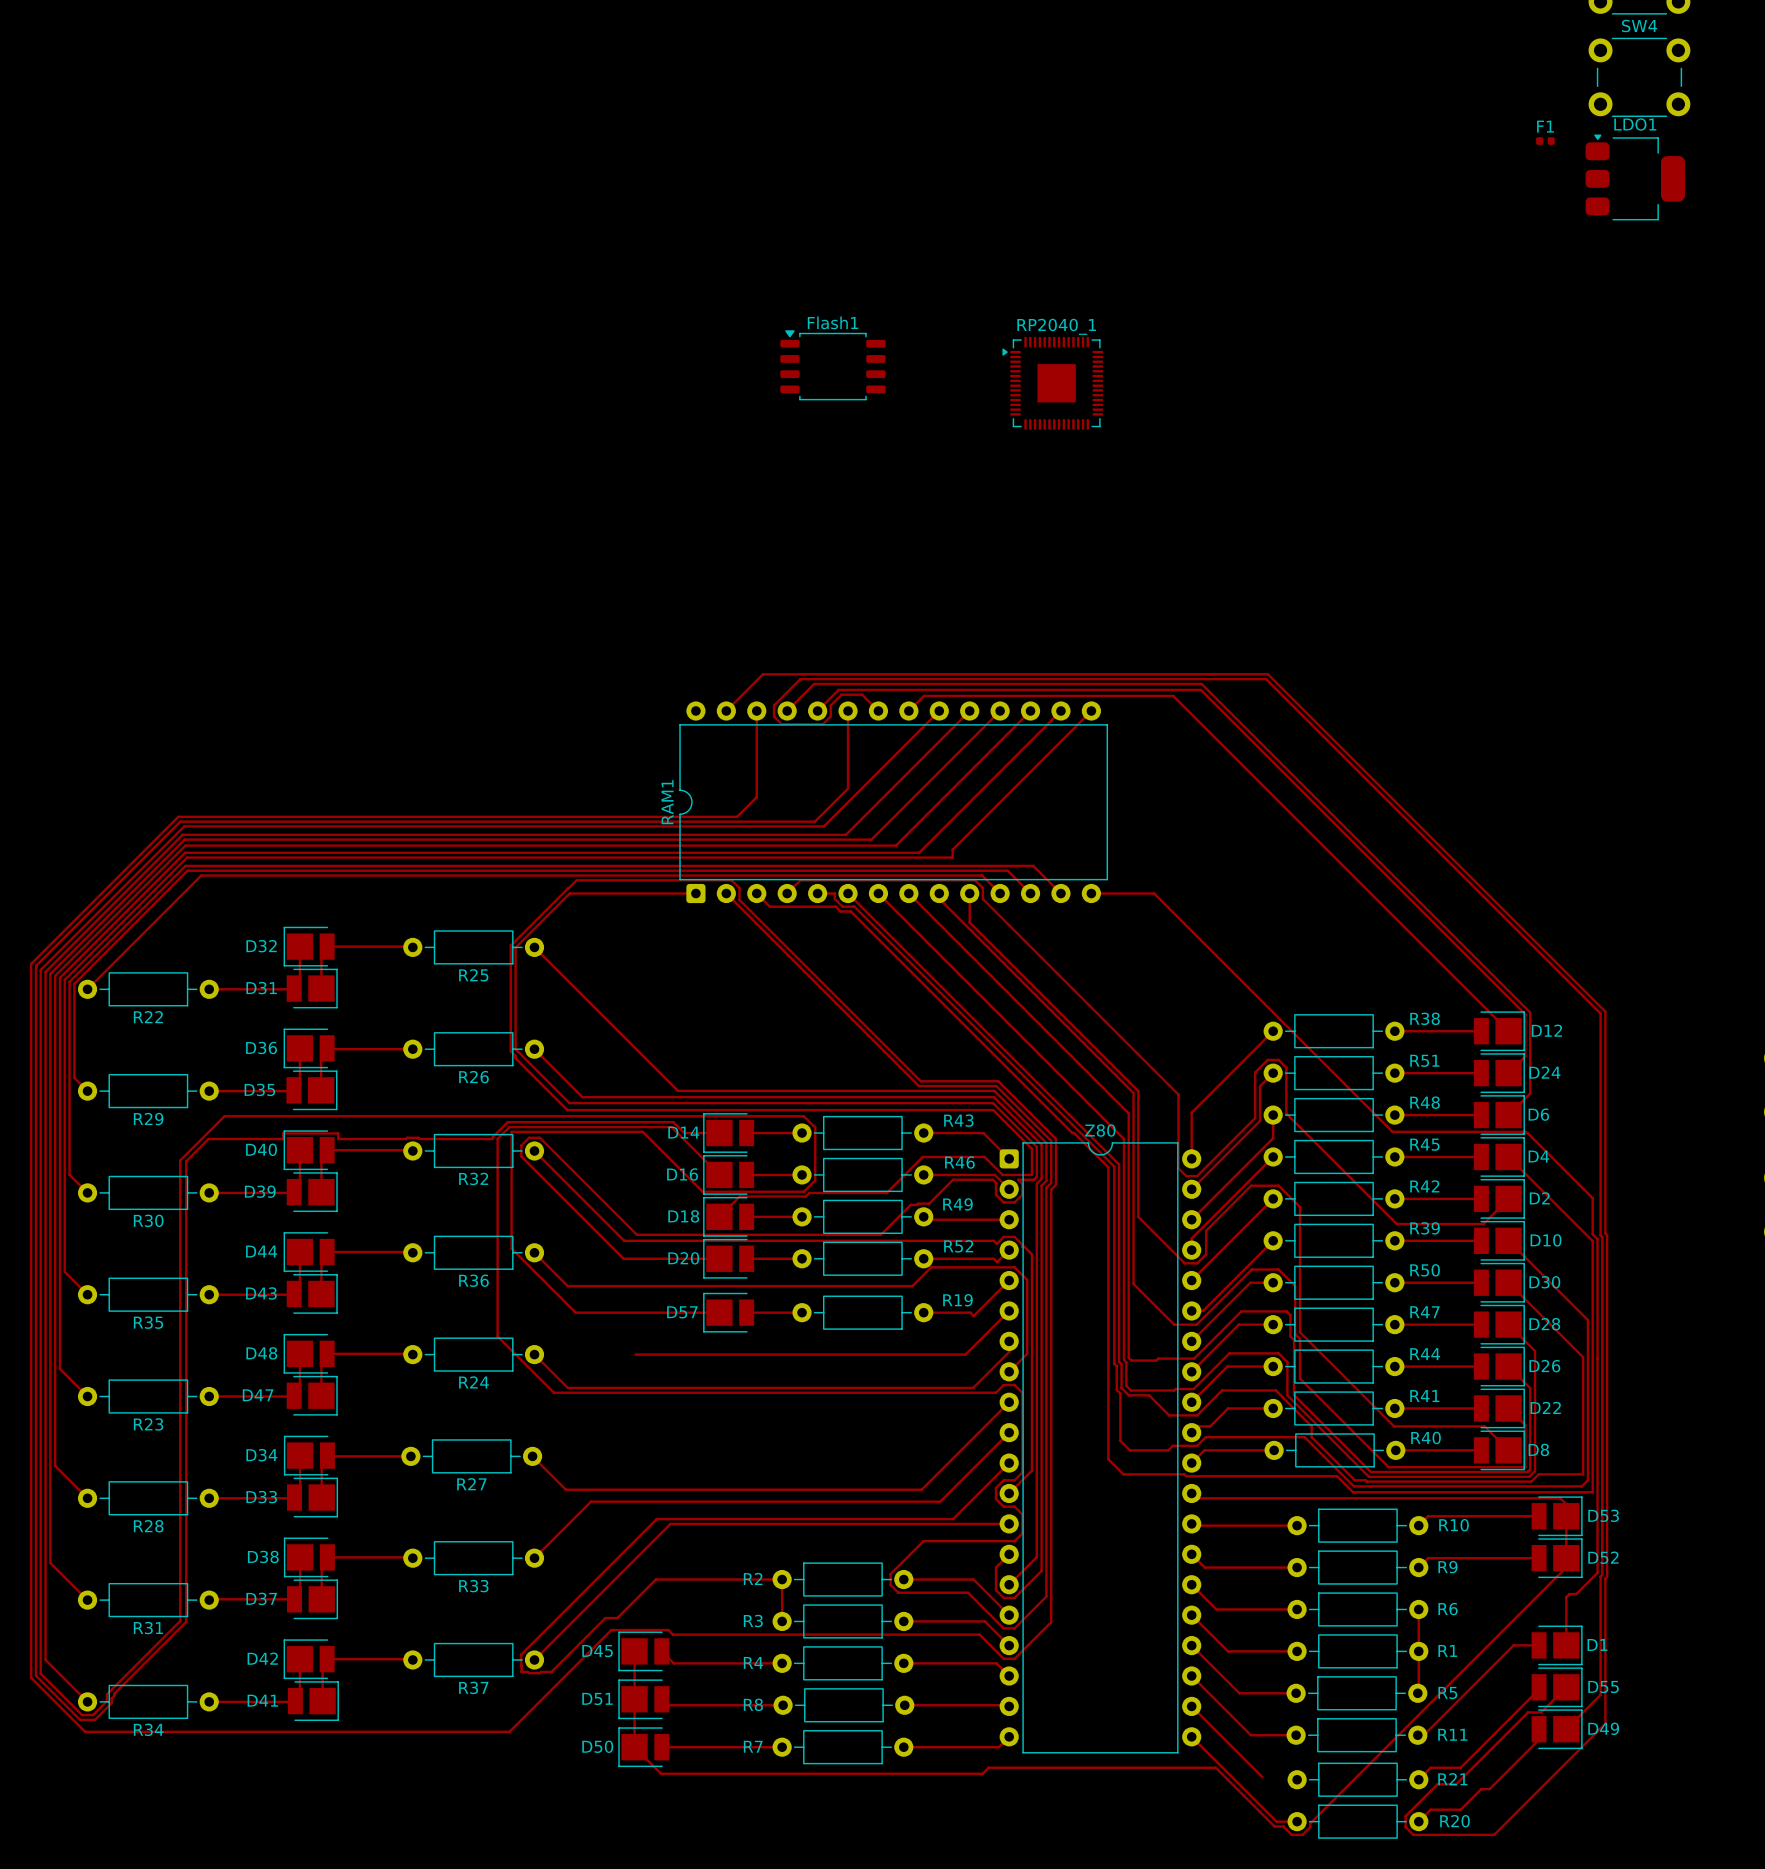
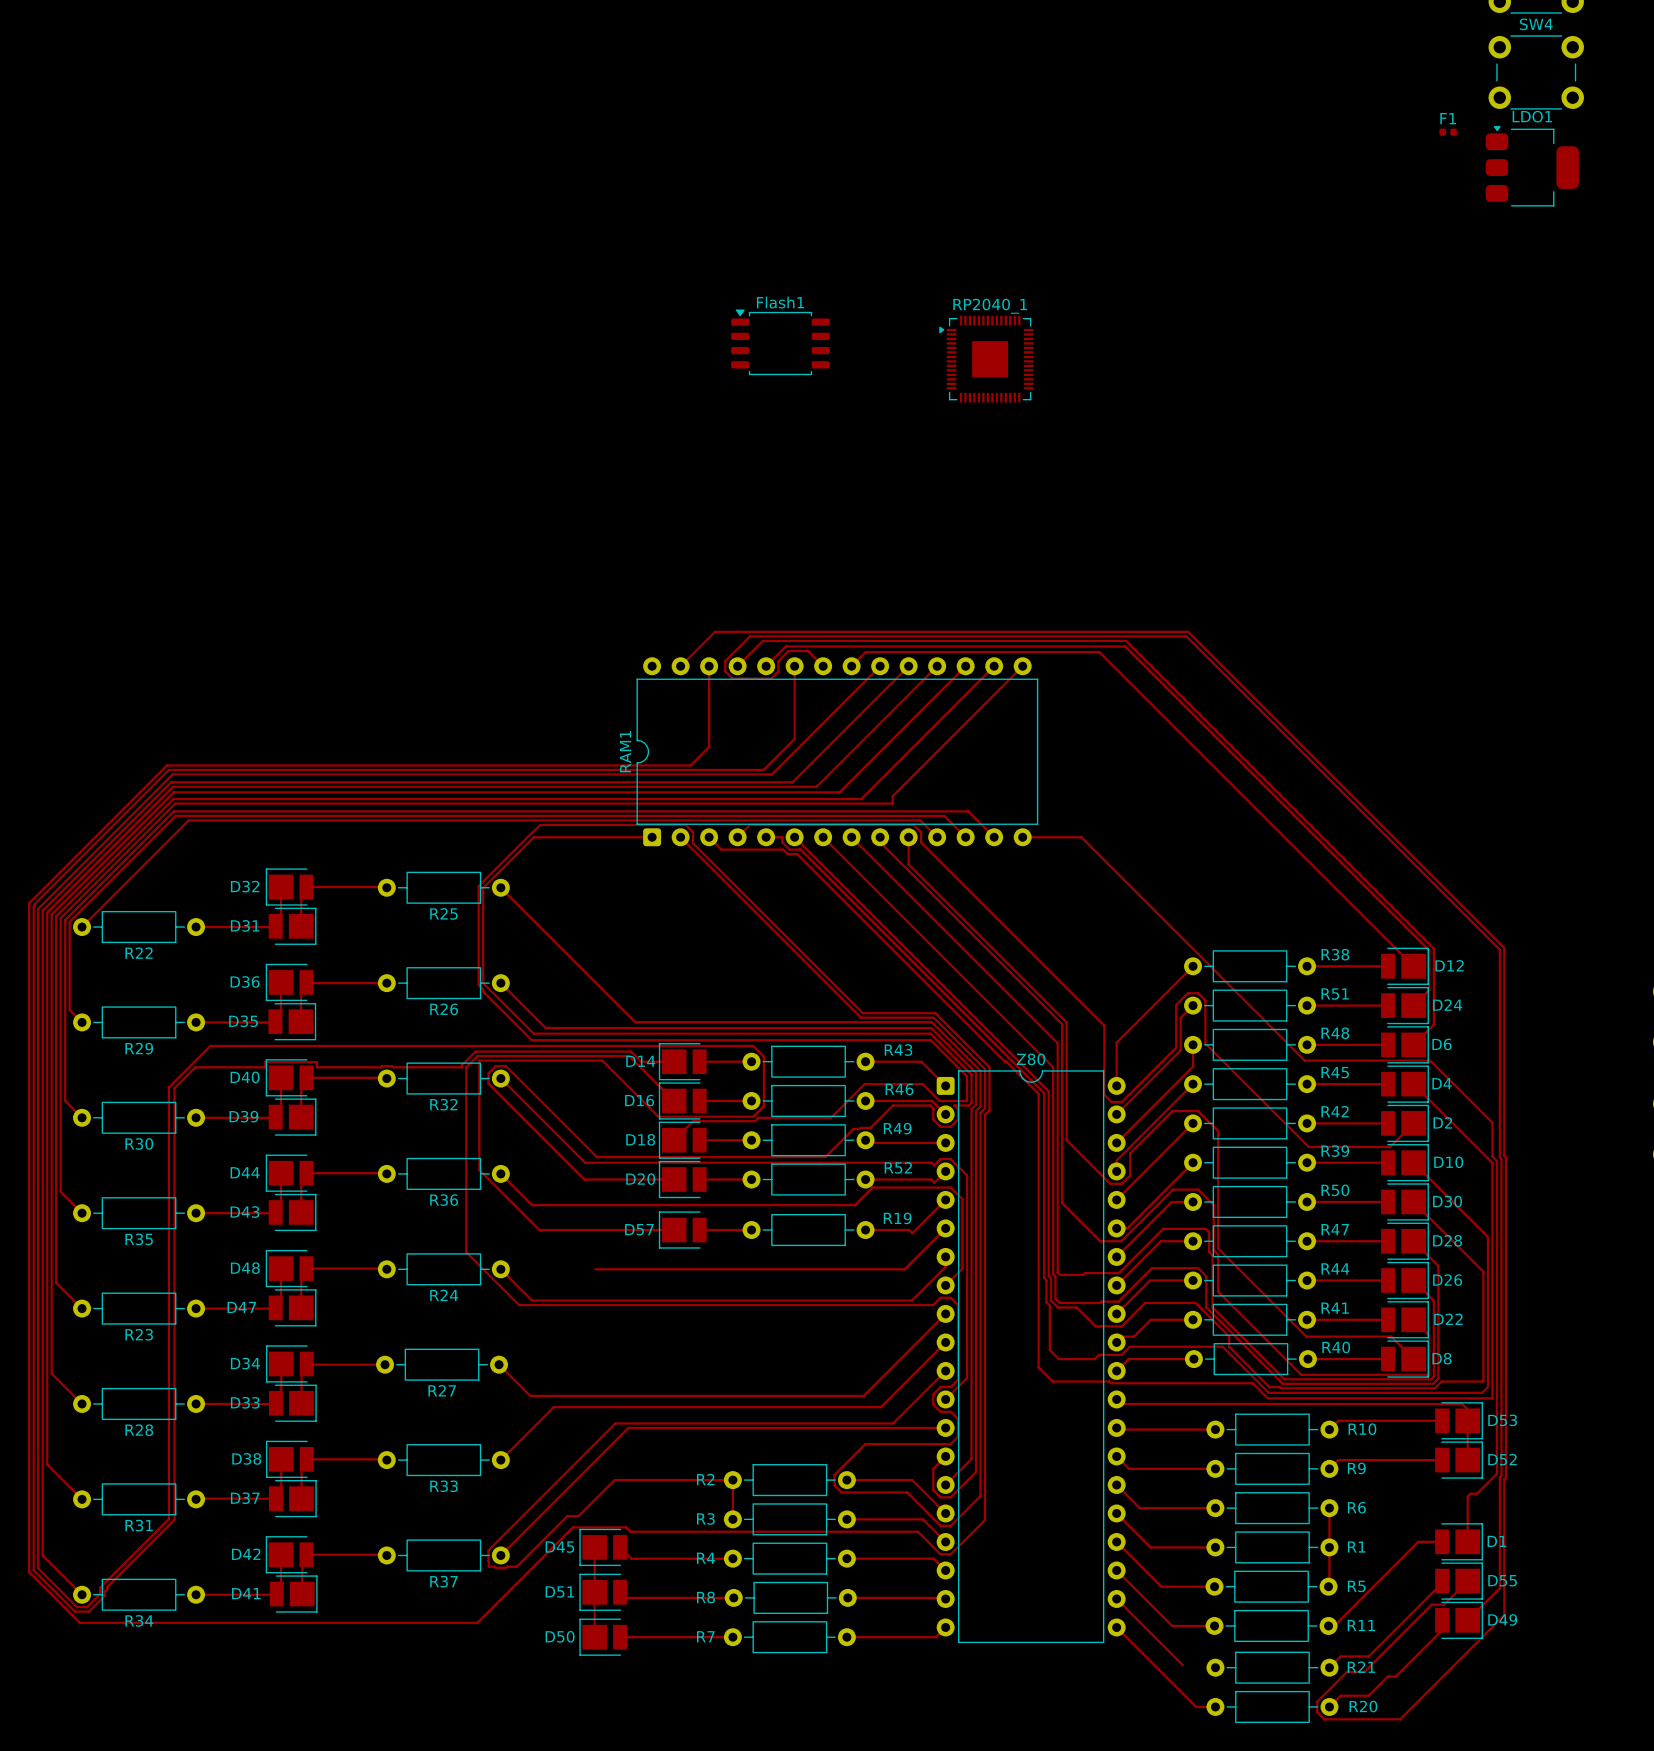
top track: (1566, 1558) (1566, 1567) (1310, 1823) (1310, 1827) (1302, 1834) (1291, 1834) (1283, 1826) (1274, 1826) (1215, 1767) (988, 1767) (982, 1773) (661, 1773) (634, 1747) -> none

